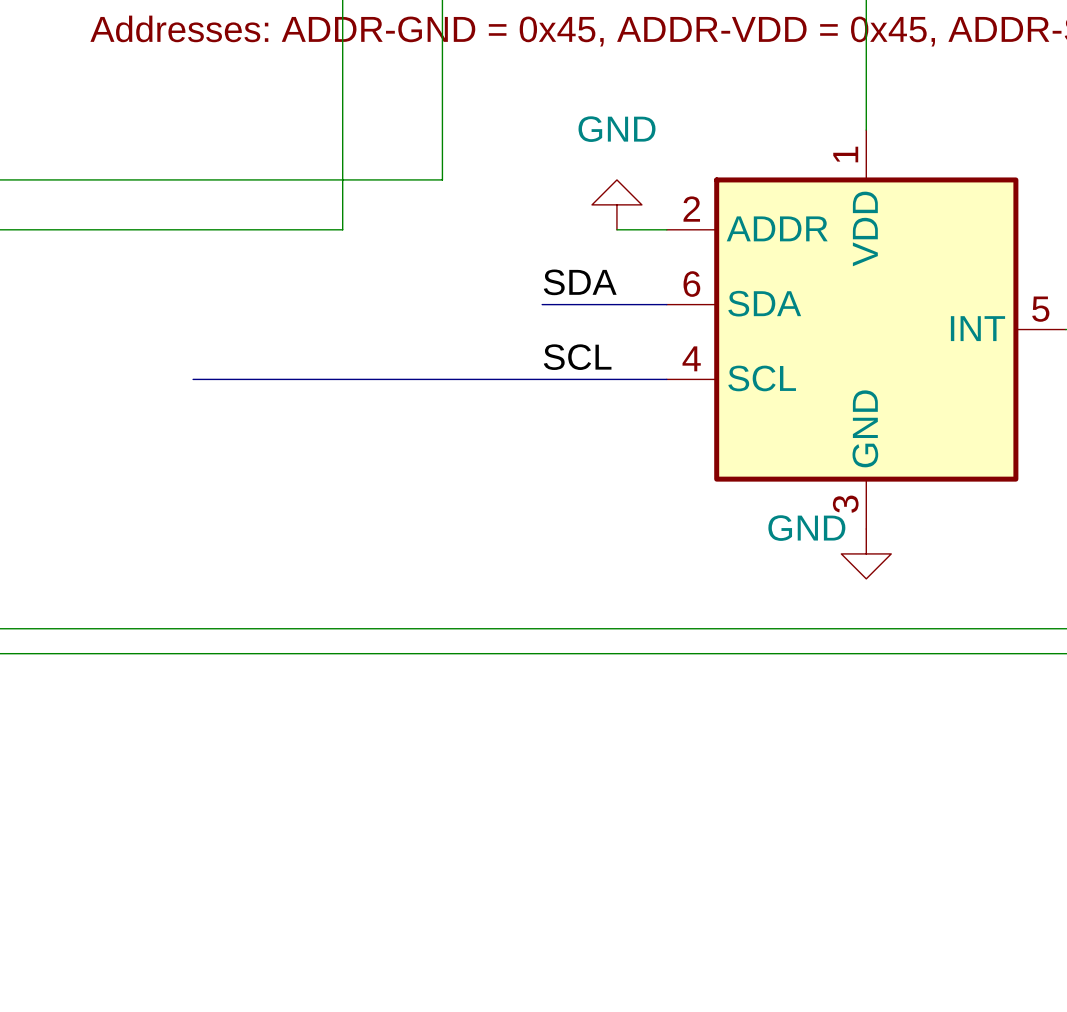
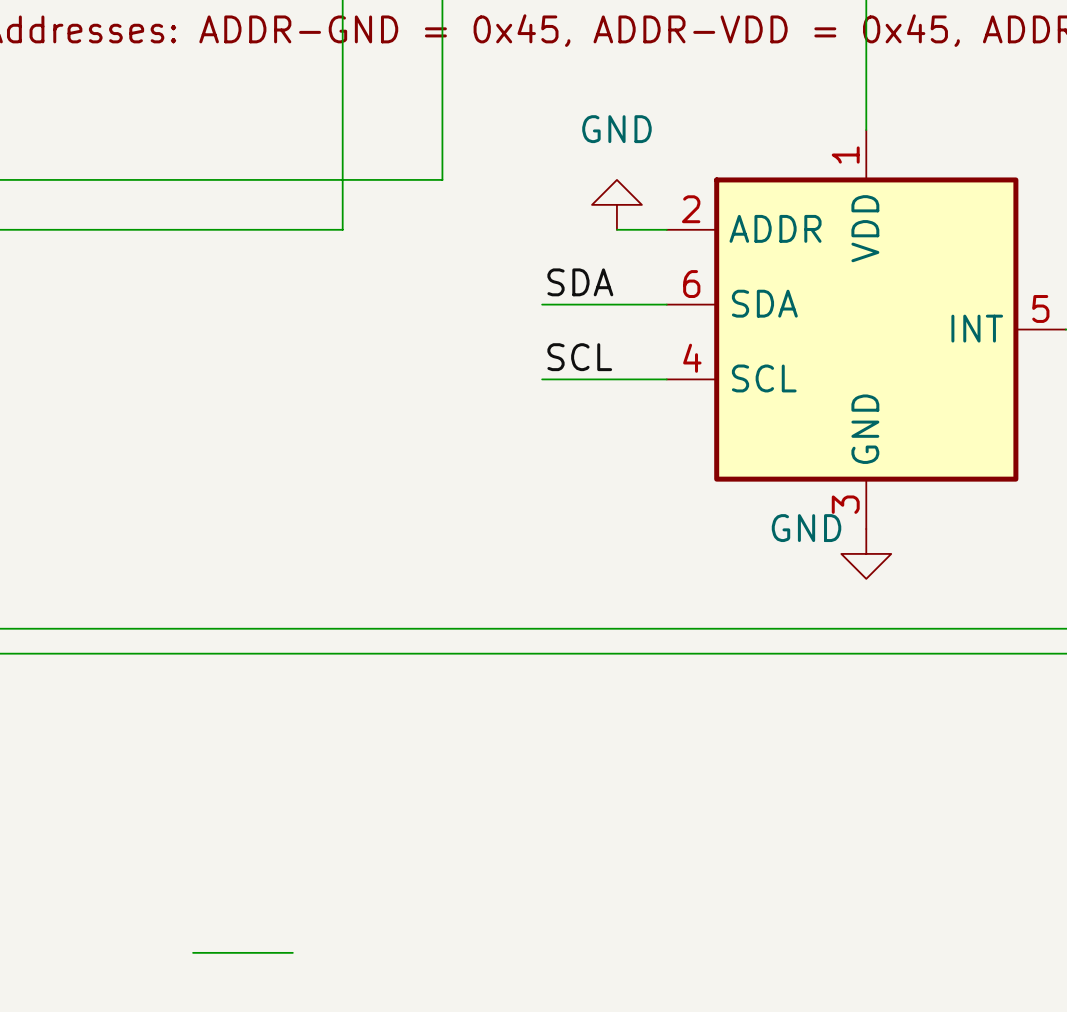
bus: (542, 304) (666, 304) -> none
bus: (193, 379) (666, 379) -> none
wire: none -> (193, 952) (292, 952)

